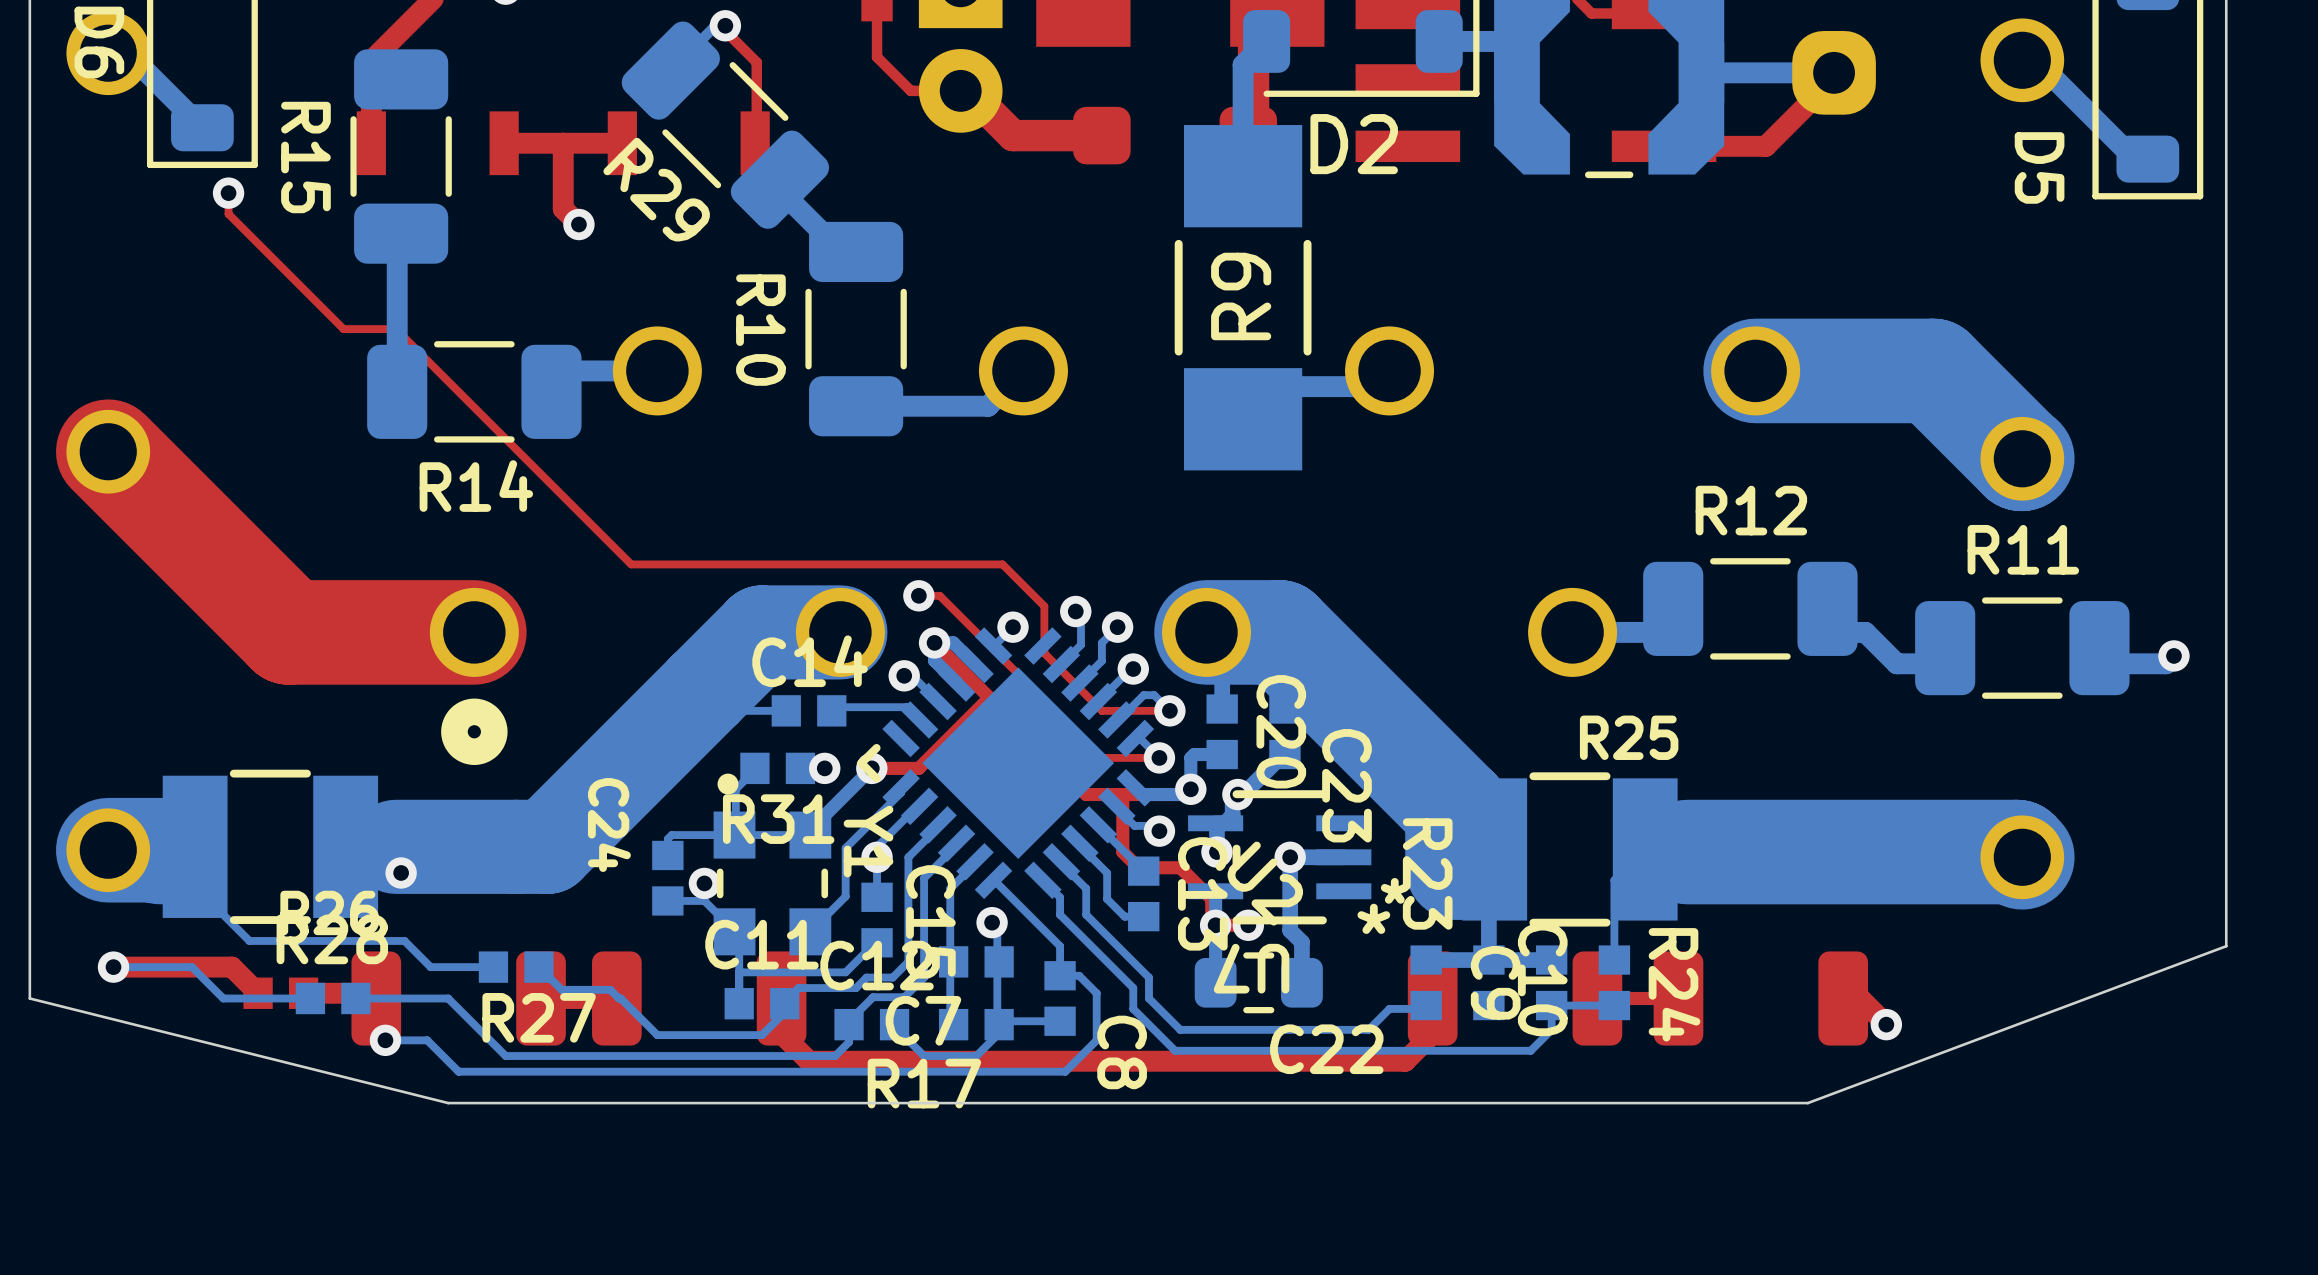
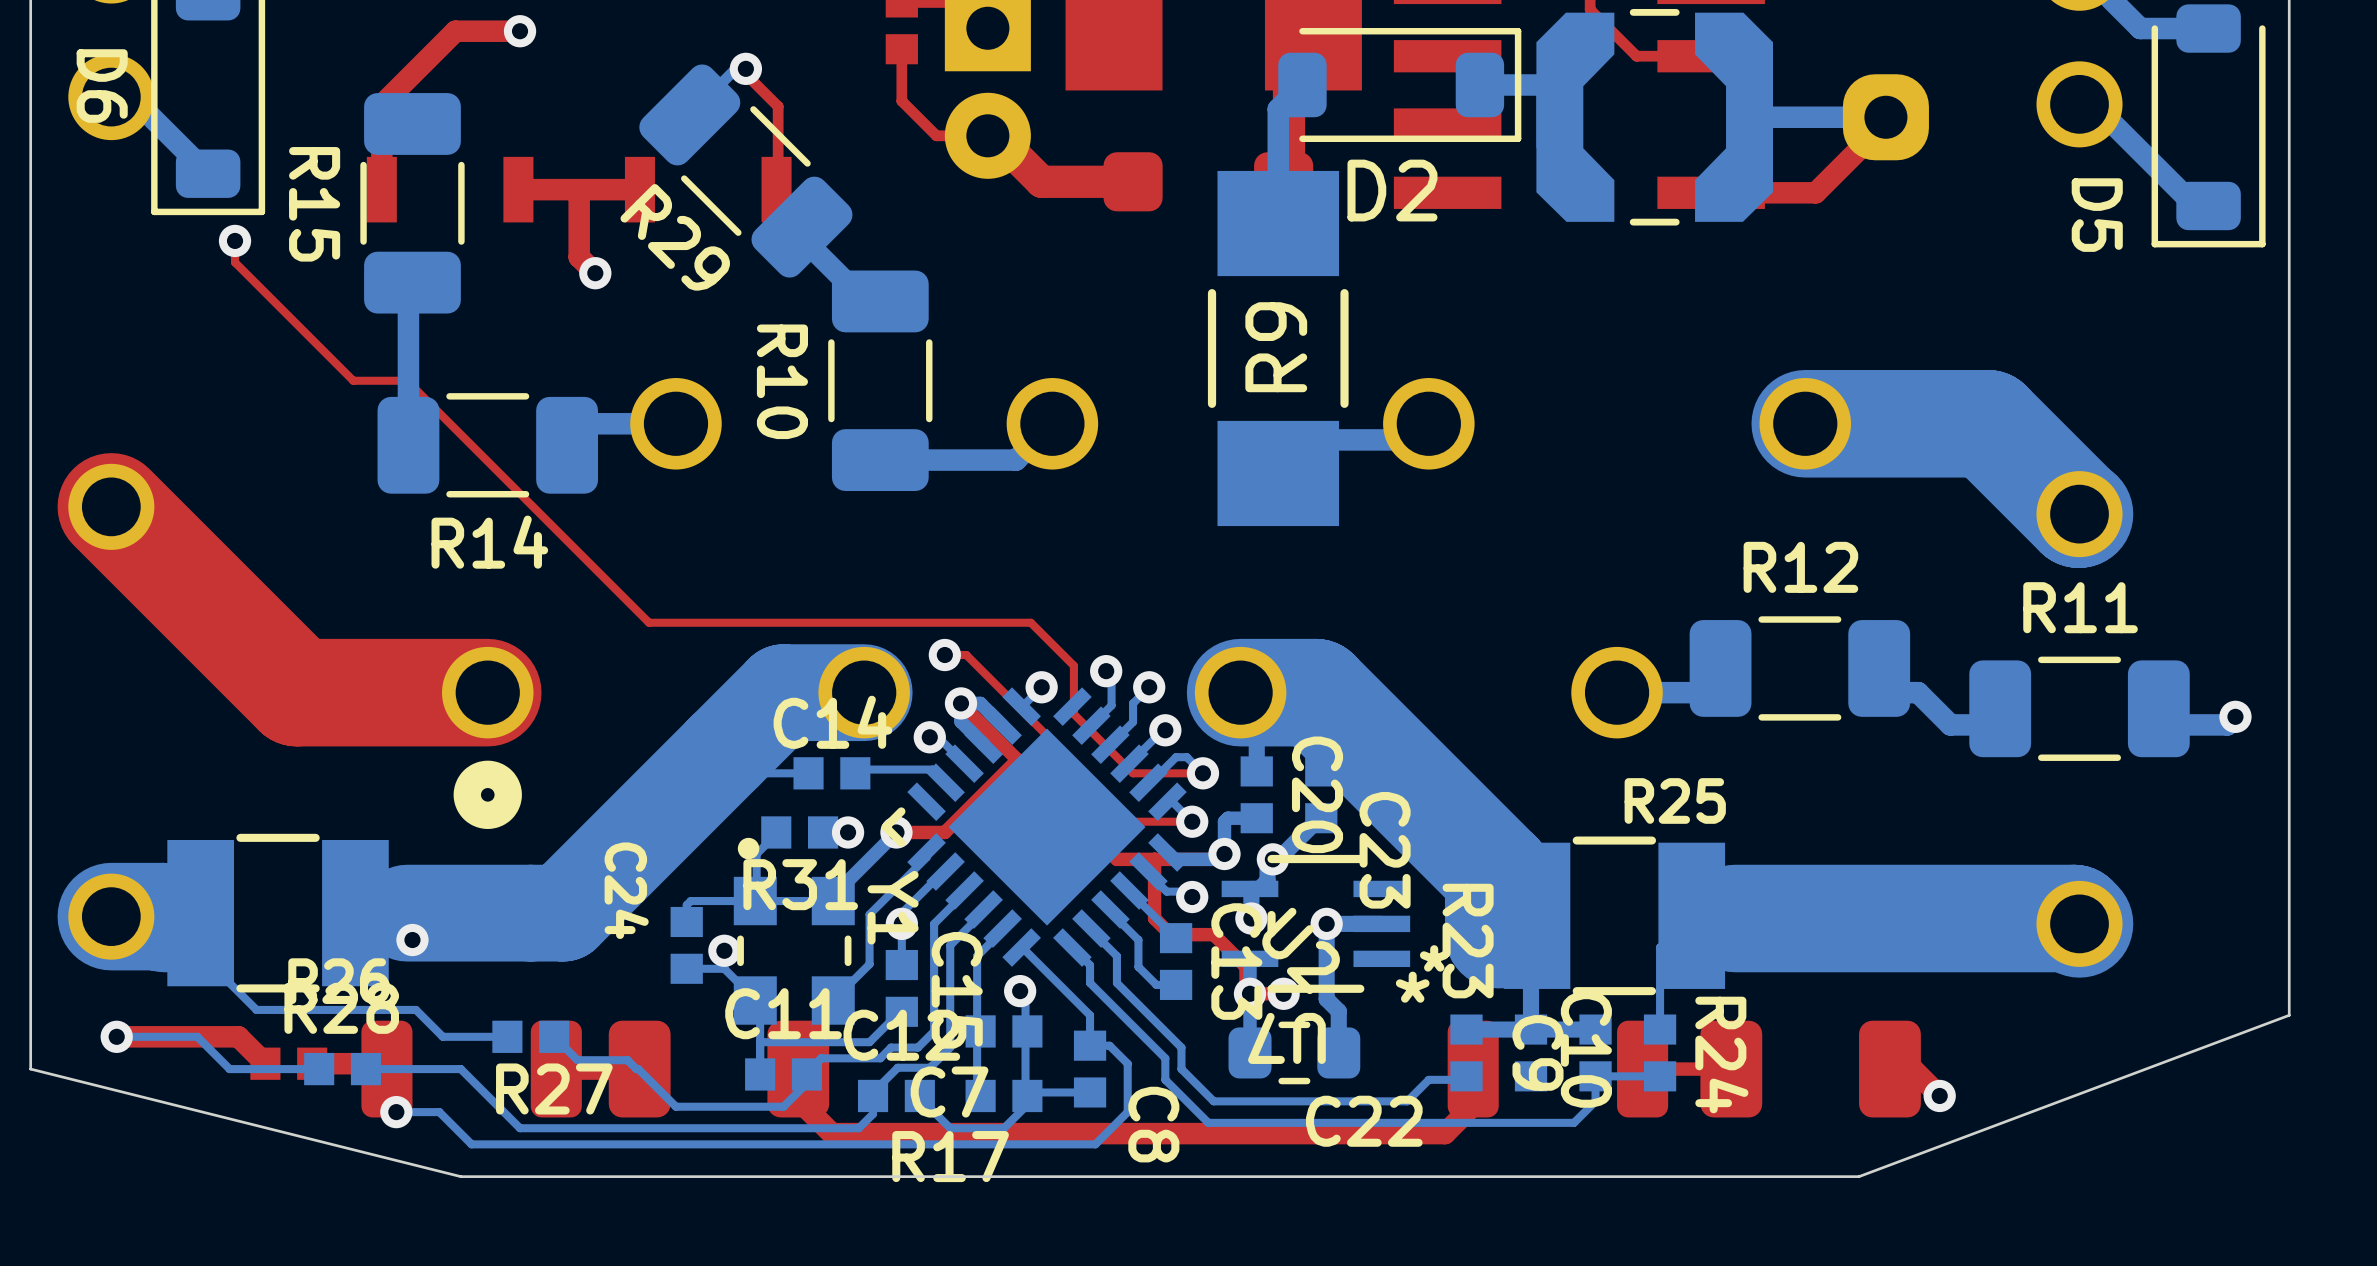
part footprint: [592, 951, 807, 1046] -> [608, 1020, 830, 1118]
part footprint: [1653, 951, 1869, 1046] -> [1700, 1020, 1921, 1118]

